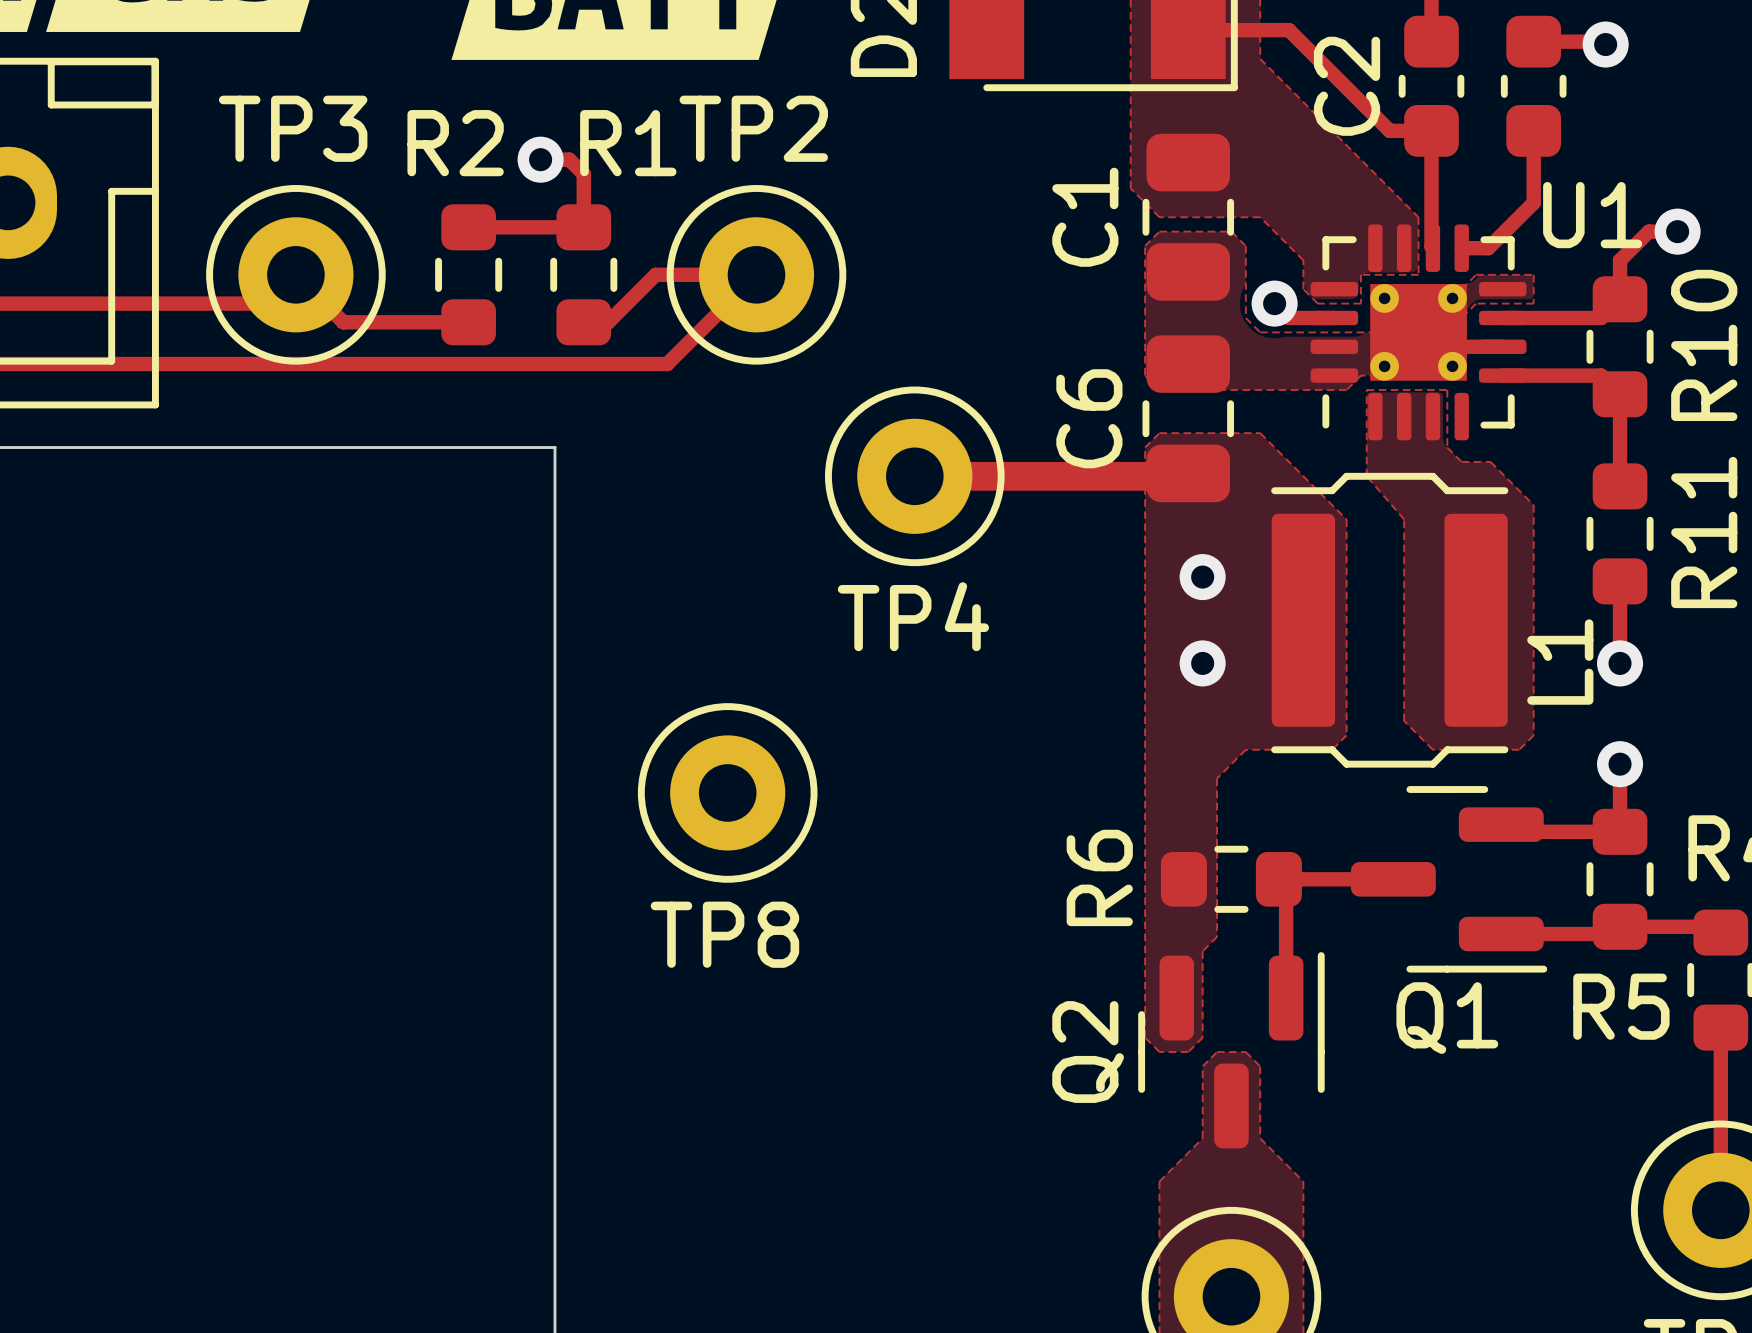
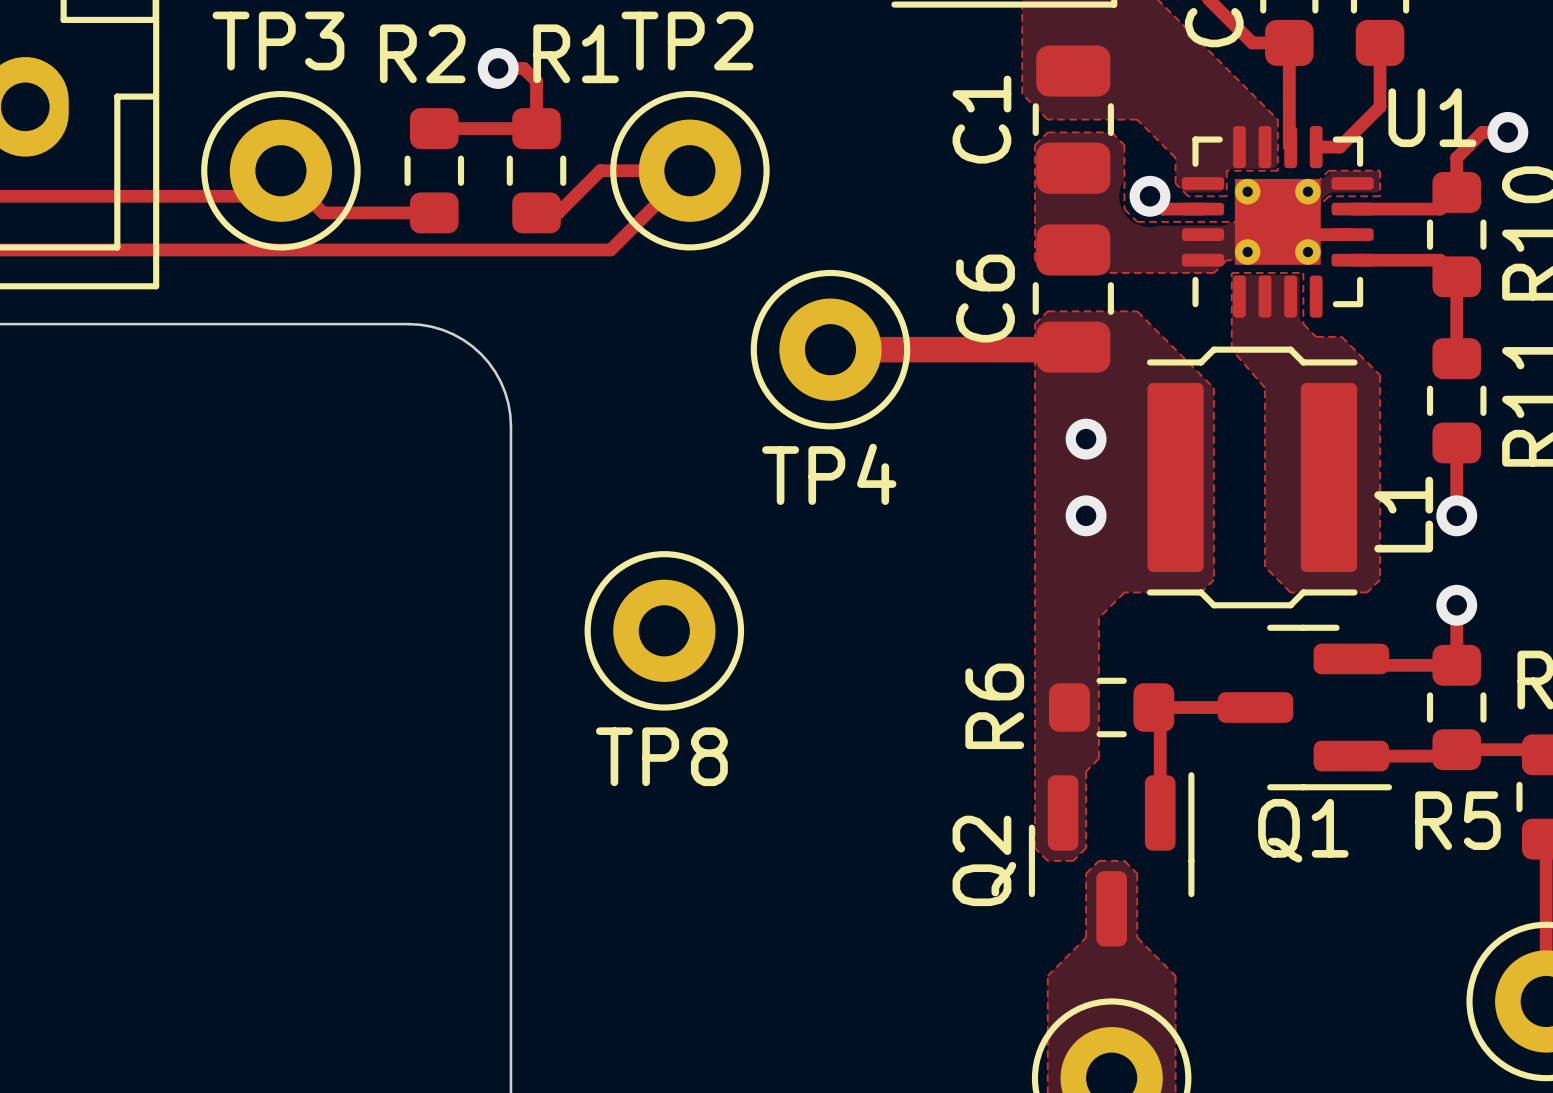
board edge: (439, 447) (554, 447) (554, 562) -> (408, 324) (431, 326) (453, 334) (481, 354) (495, 371) (505, 392) (510, 426)

